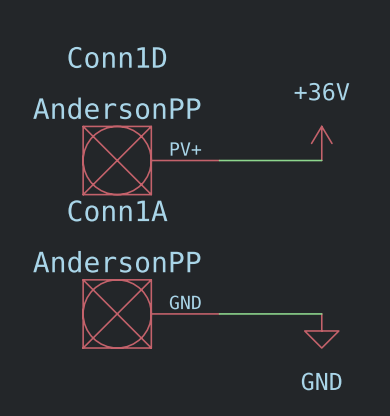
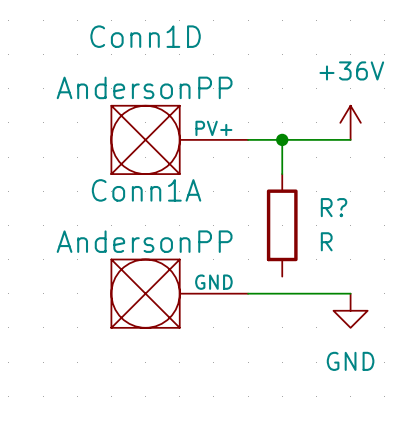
wire: none -> (282, 139) (282, 174)
junction: none -> (282, 139)
R?: none -> R (282, 225)

